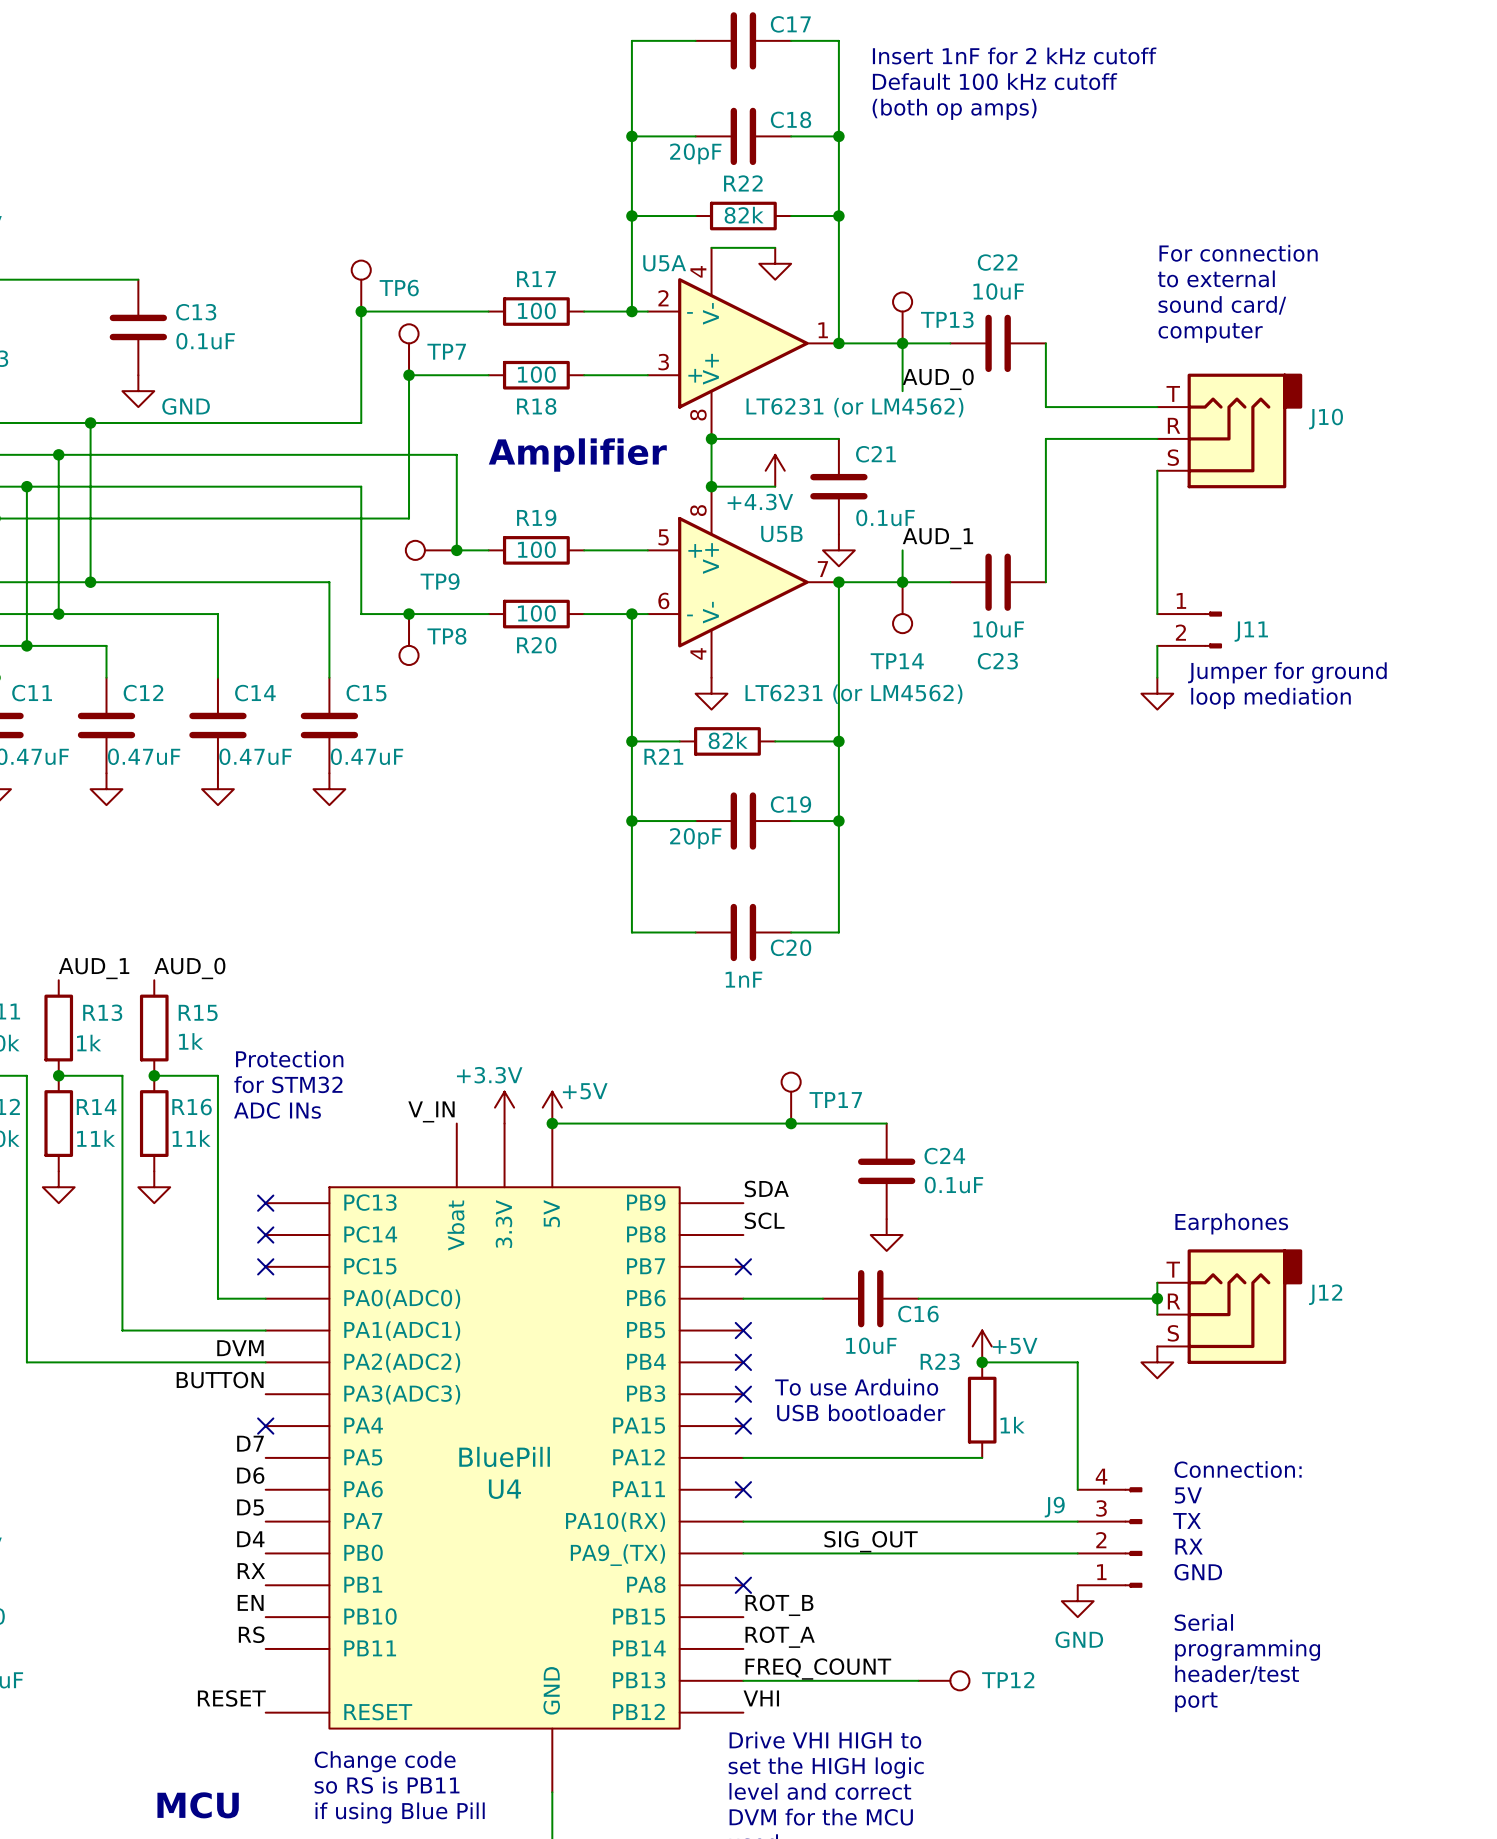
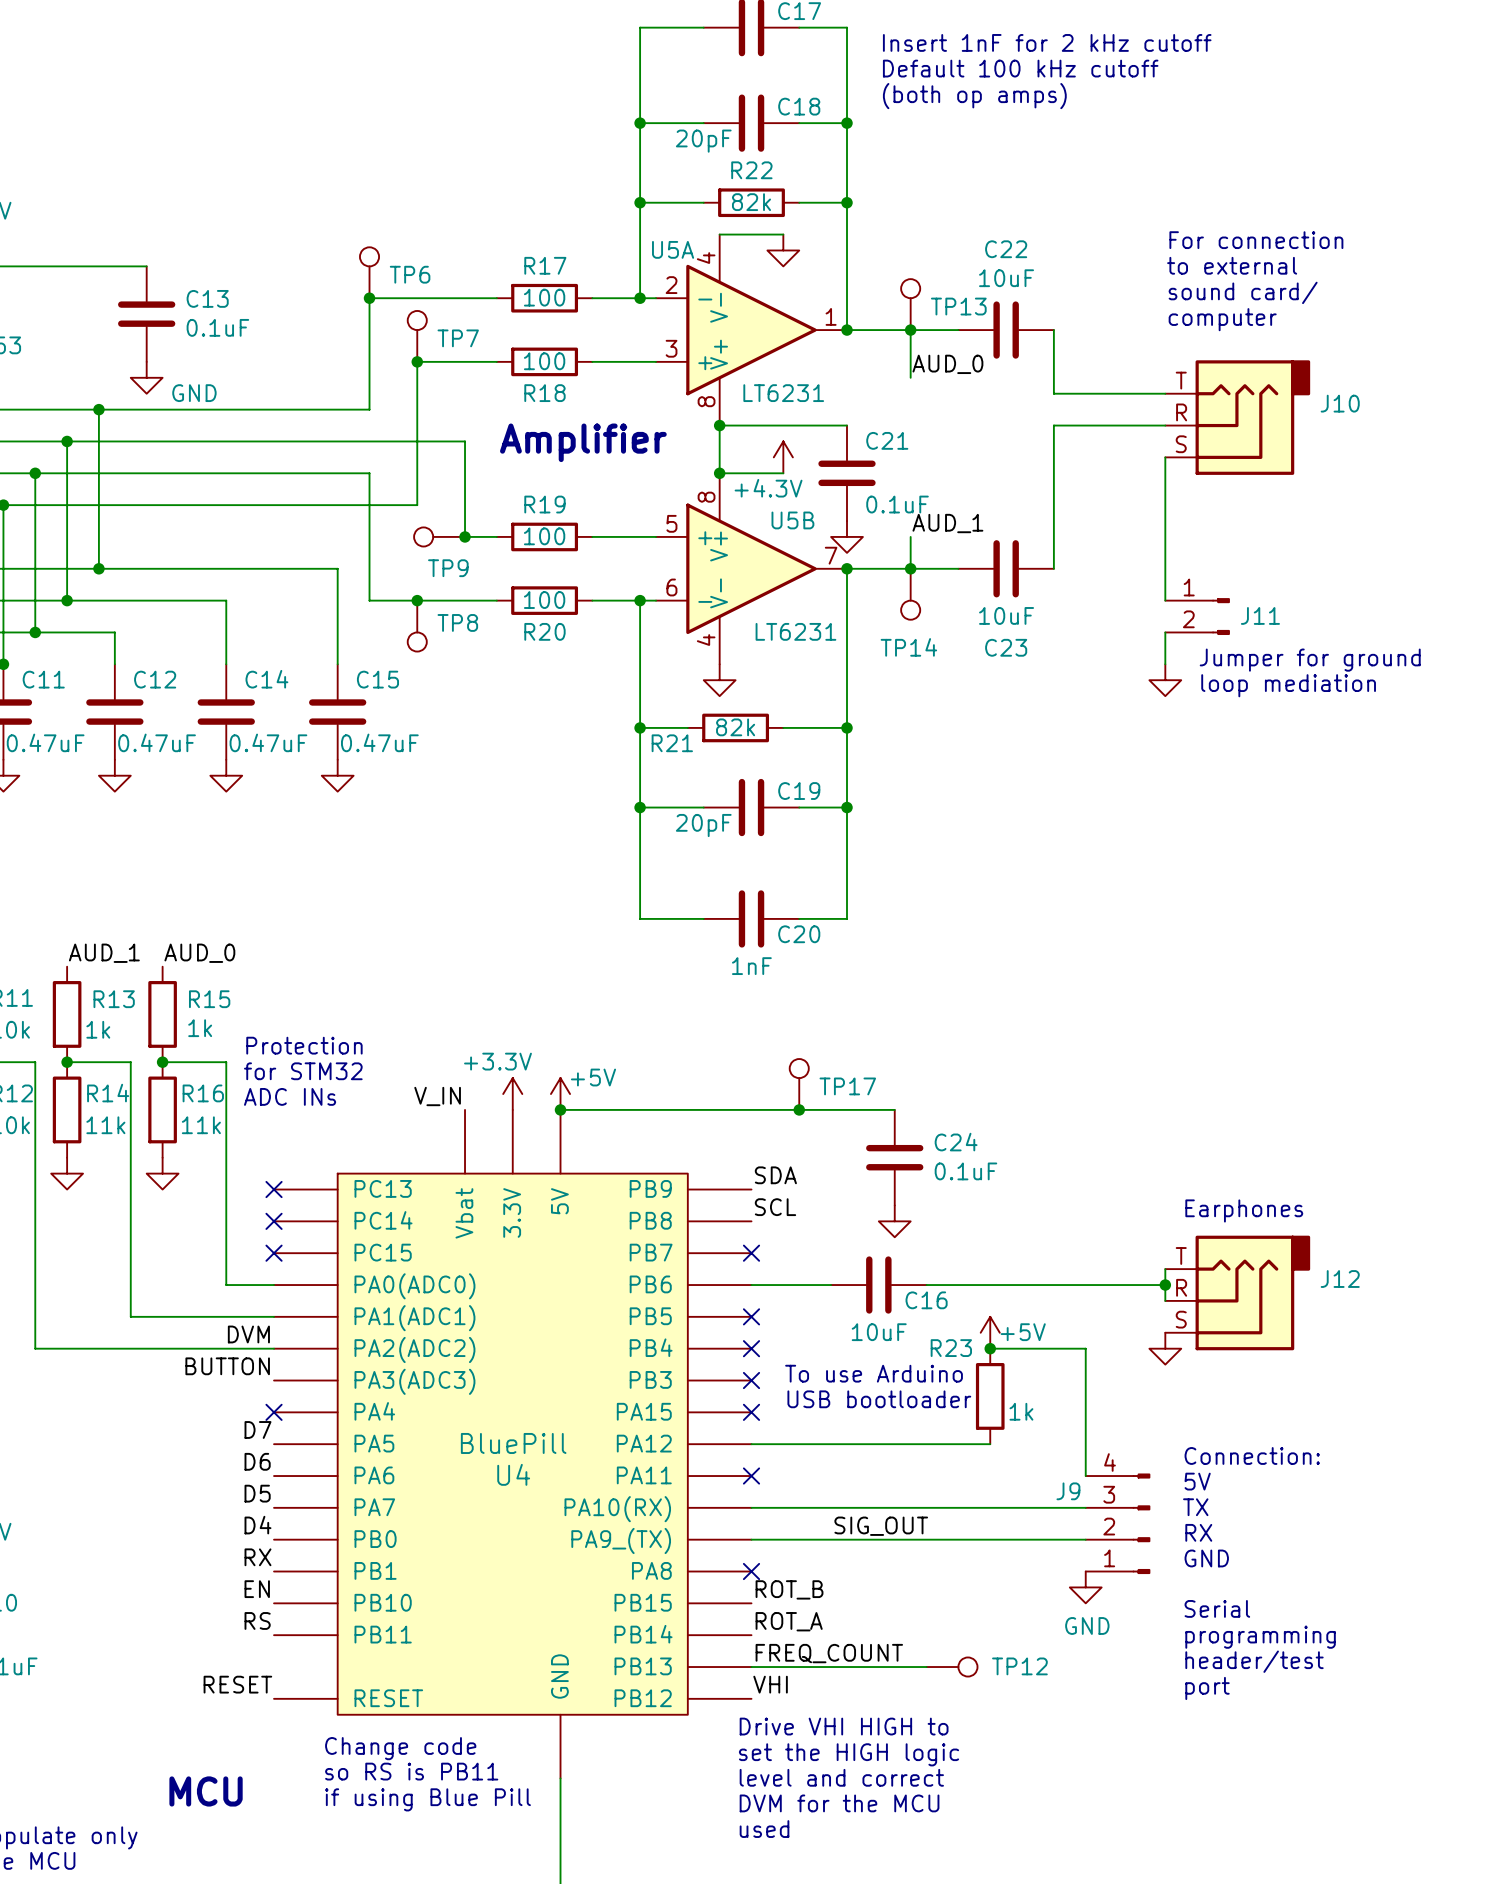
U5A value: LT6231 (or LM4562) (854, 407) -> LT6231 (783, 393)
U5B value: LT6231 (or LM4562) (853, 694) -> LT6231 (795, 631)

